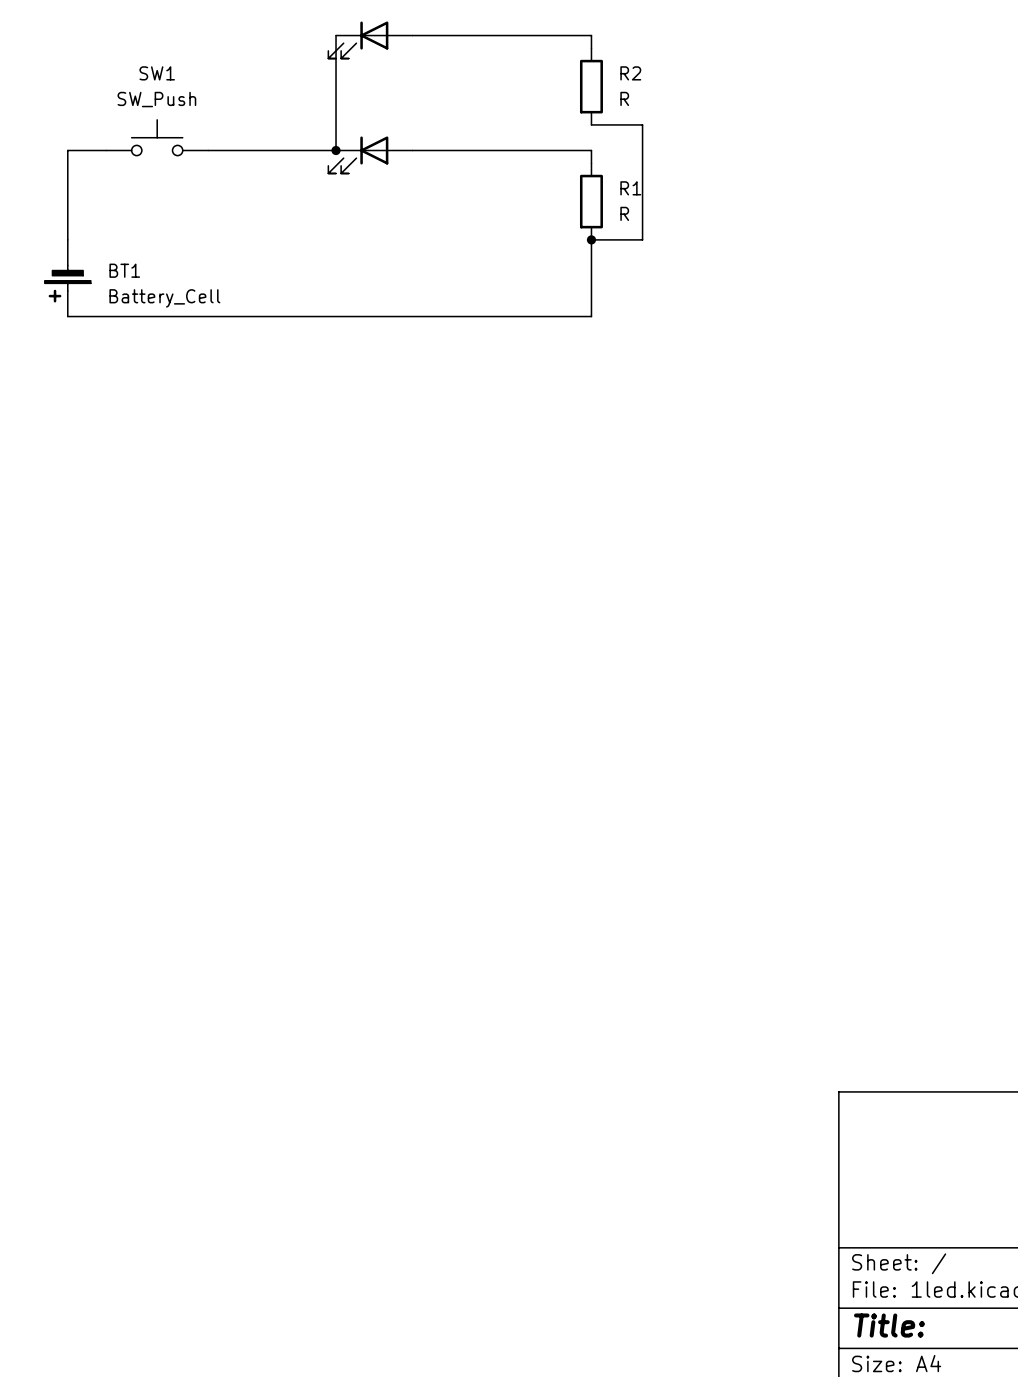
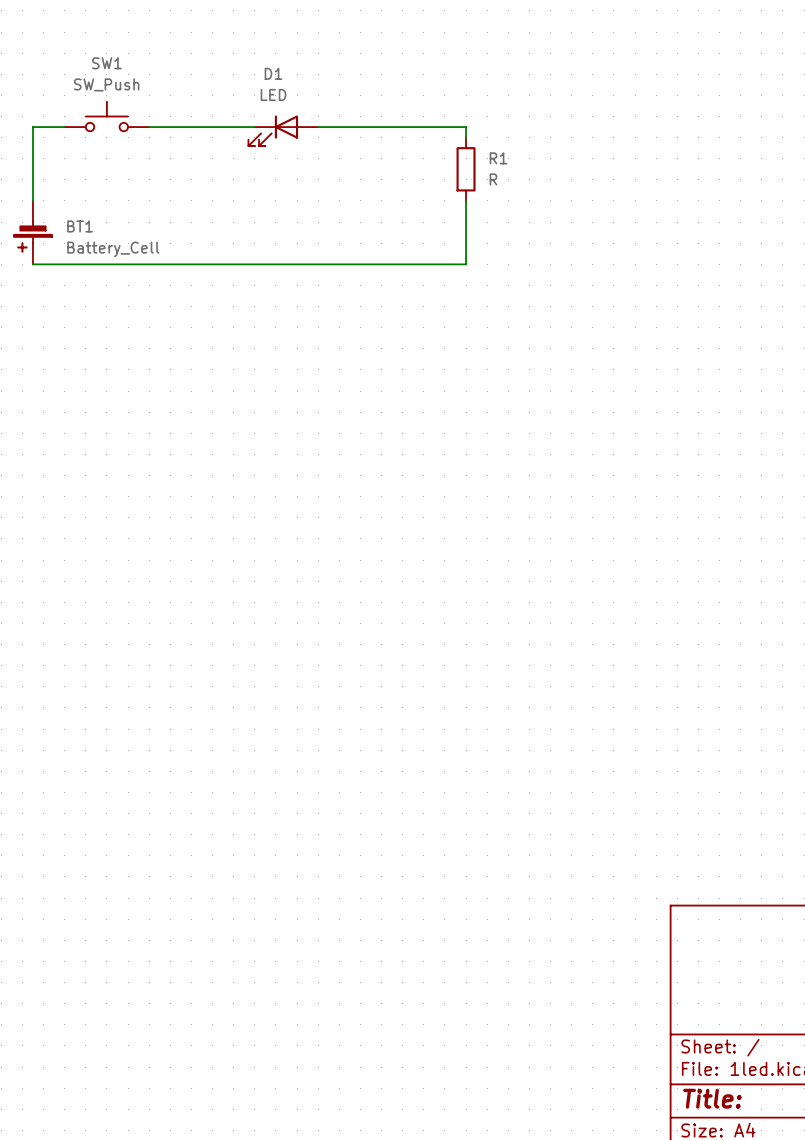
wire: (336, 35) (336, 150) -> none
wire: (412, 35) (591, 35) (591, 48) -> none
part: (370, 40) -> none
D1 name: none -> D1 (273, 73)
R2: R (591, 86) -> none
D1 value: none -> LED (273, 94)
wire: (591, 124) (642, 124) (642, 239) (591, 239) -> none
junction: (336, 150) -> none
junction: (591, 239) -> none

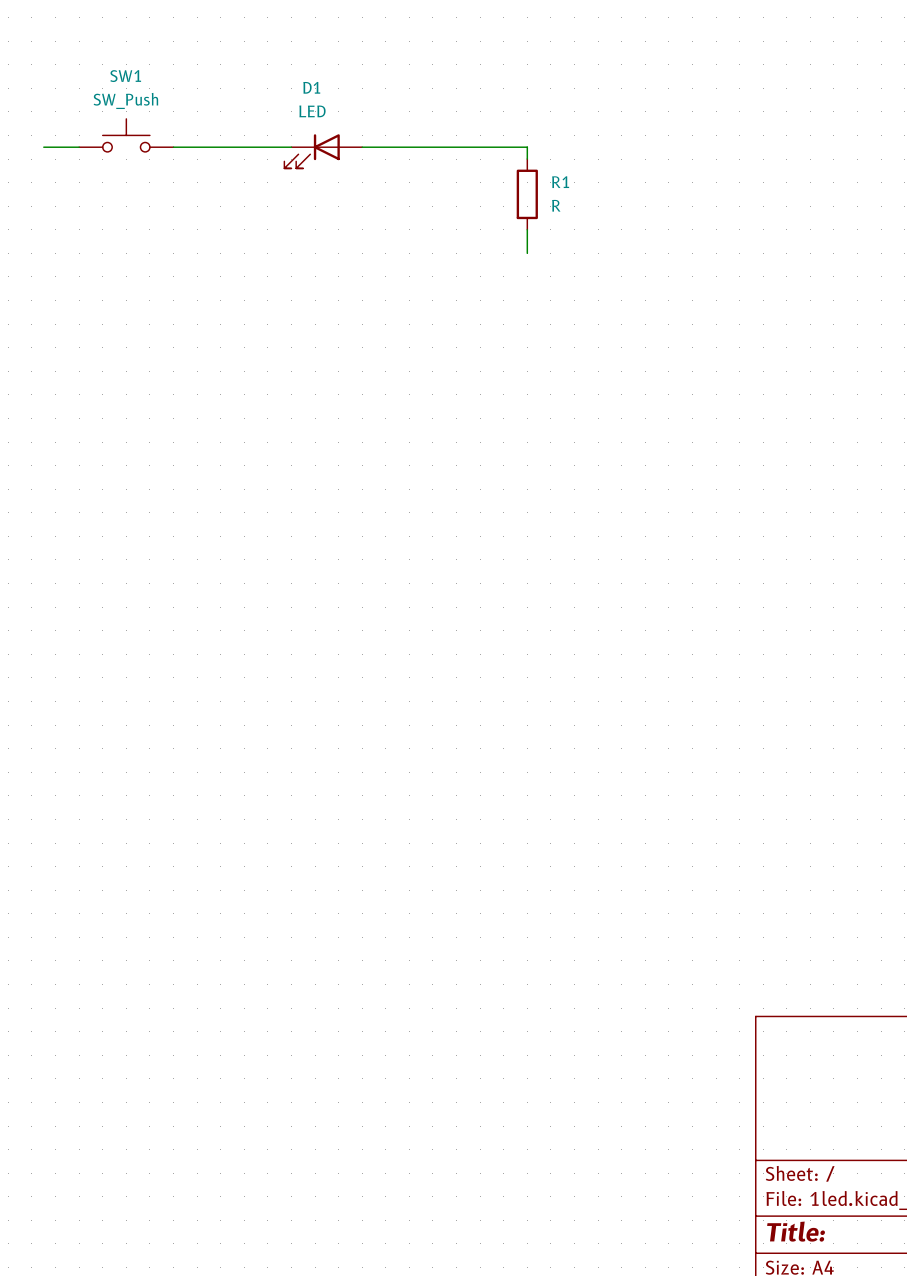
wire: (32, 127) (32, 200) -> none
wire: (466, 222) (466, 264) (32, 264) -> none
BT1: Battery_Cell (32, 232) -> none

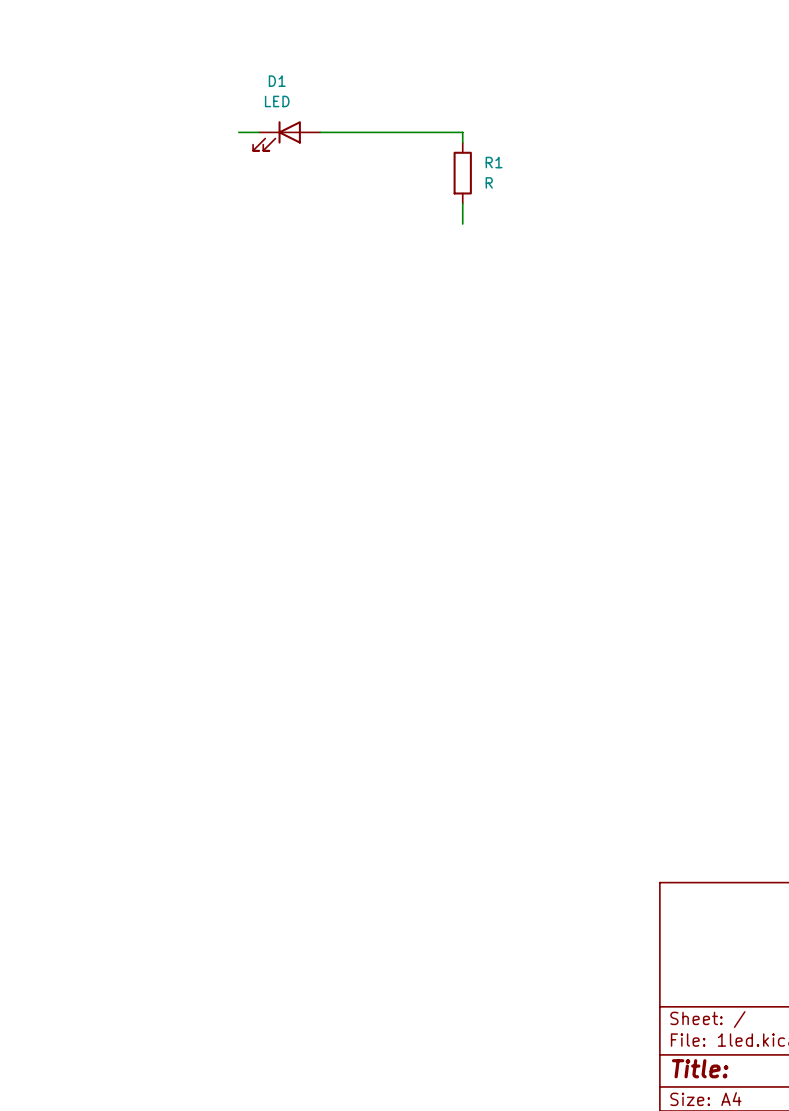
SW1: SW_Push (126, 135) -> none
wire: (43, 147) (79, 147) -> none
wire: (173, 147) (267, 147) -> none

